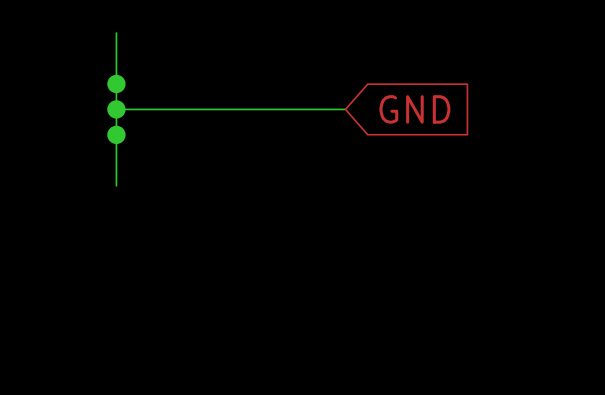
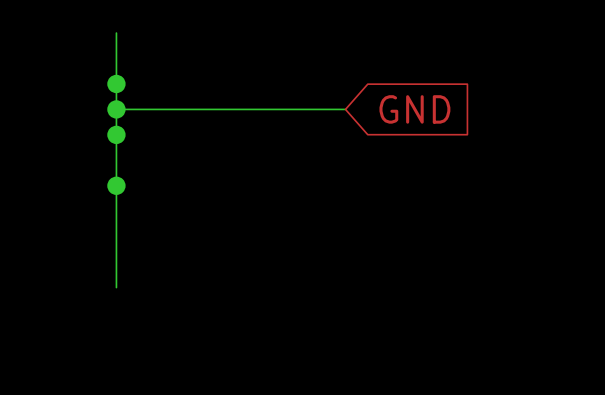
wire: none -> (116, 185) (116, 287)
junction: none -> (116, 185)

